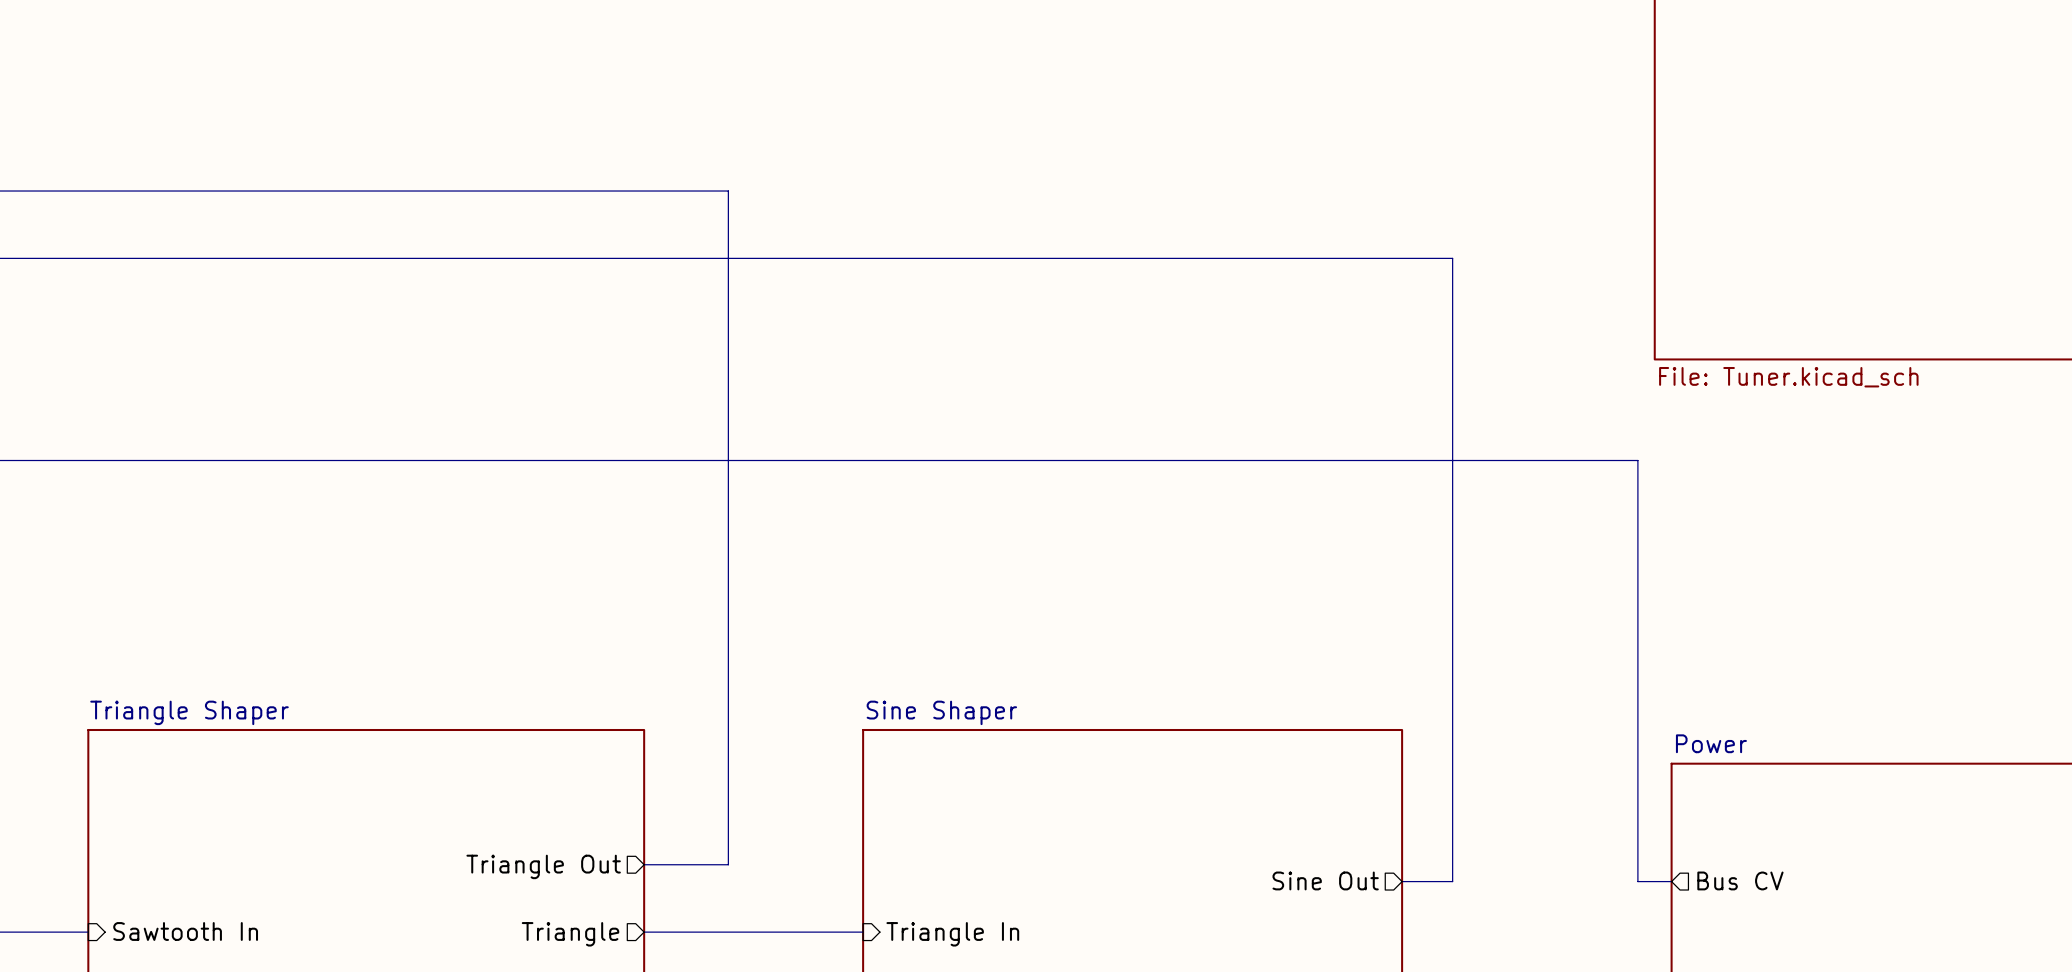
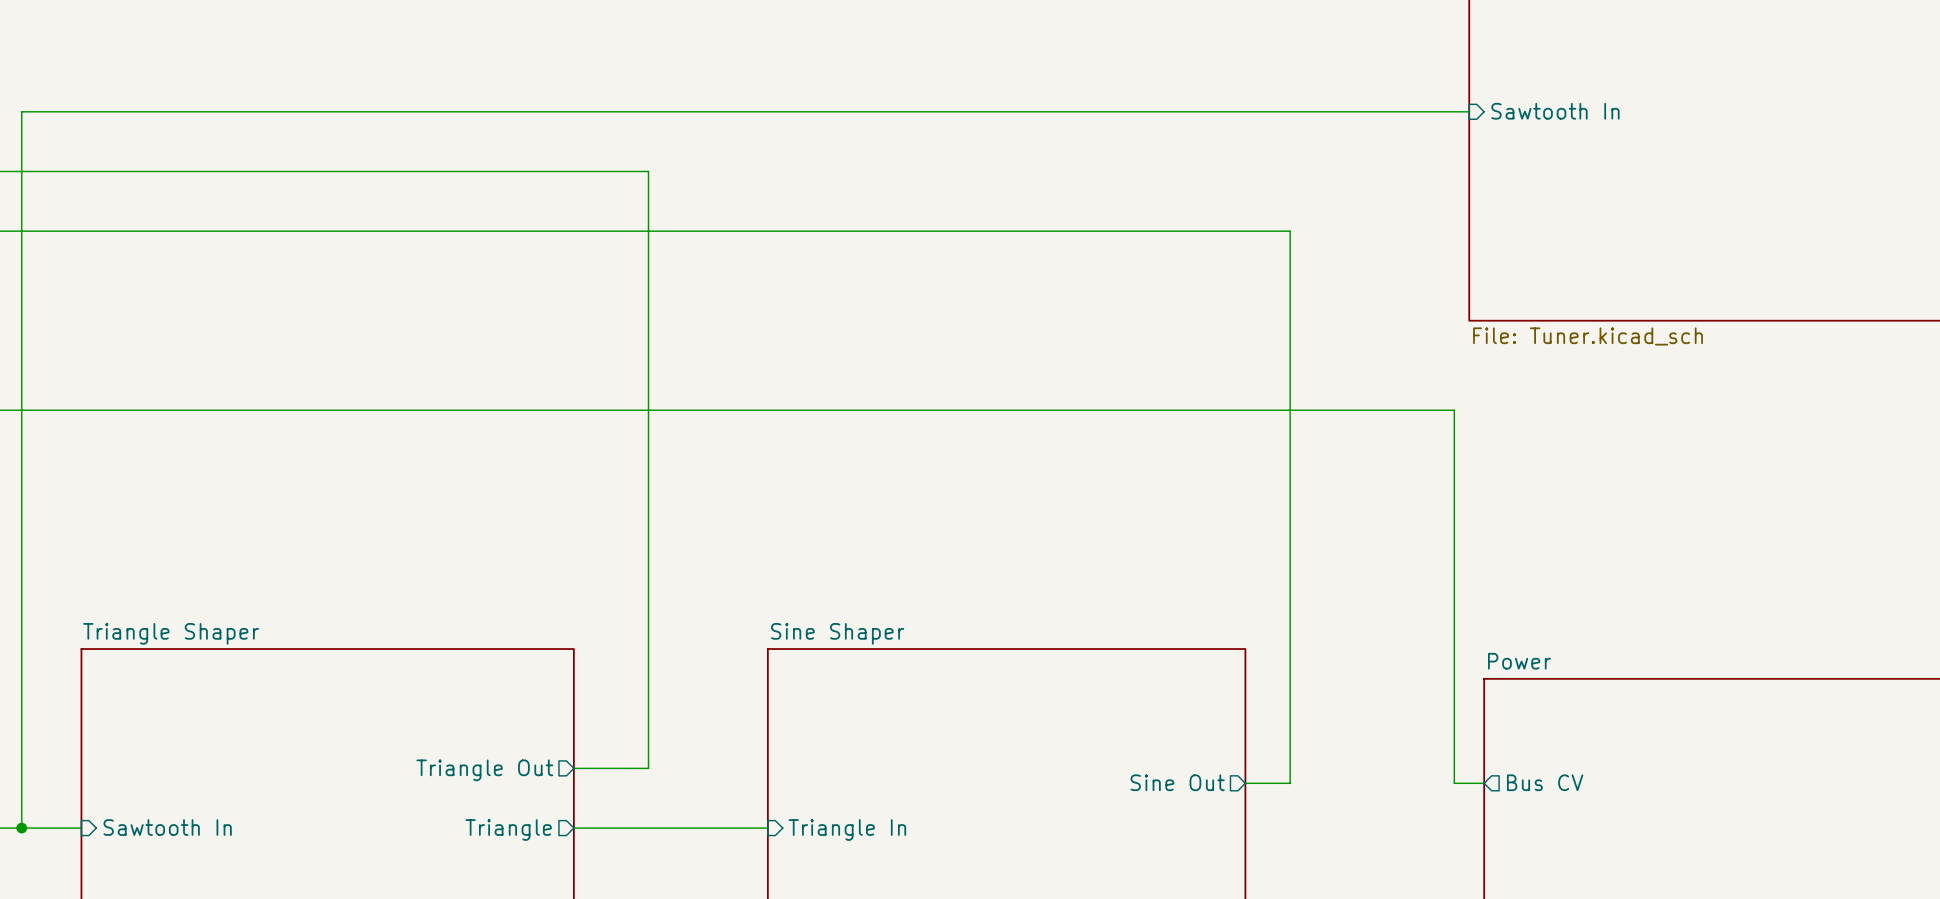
wire: none -> (1469, 111) (21, 111) (21, 828)
sheet pin: none -> Sawtooth In (1555, 111)
junction: none -> (21, 828)

